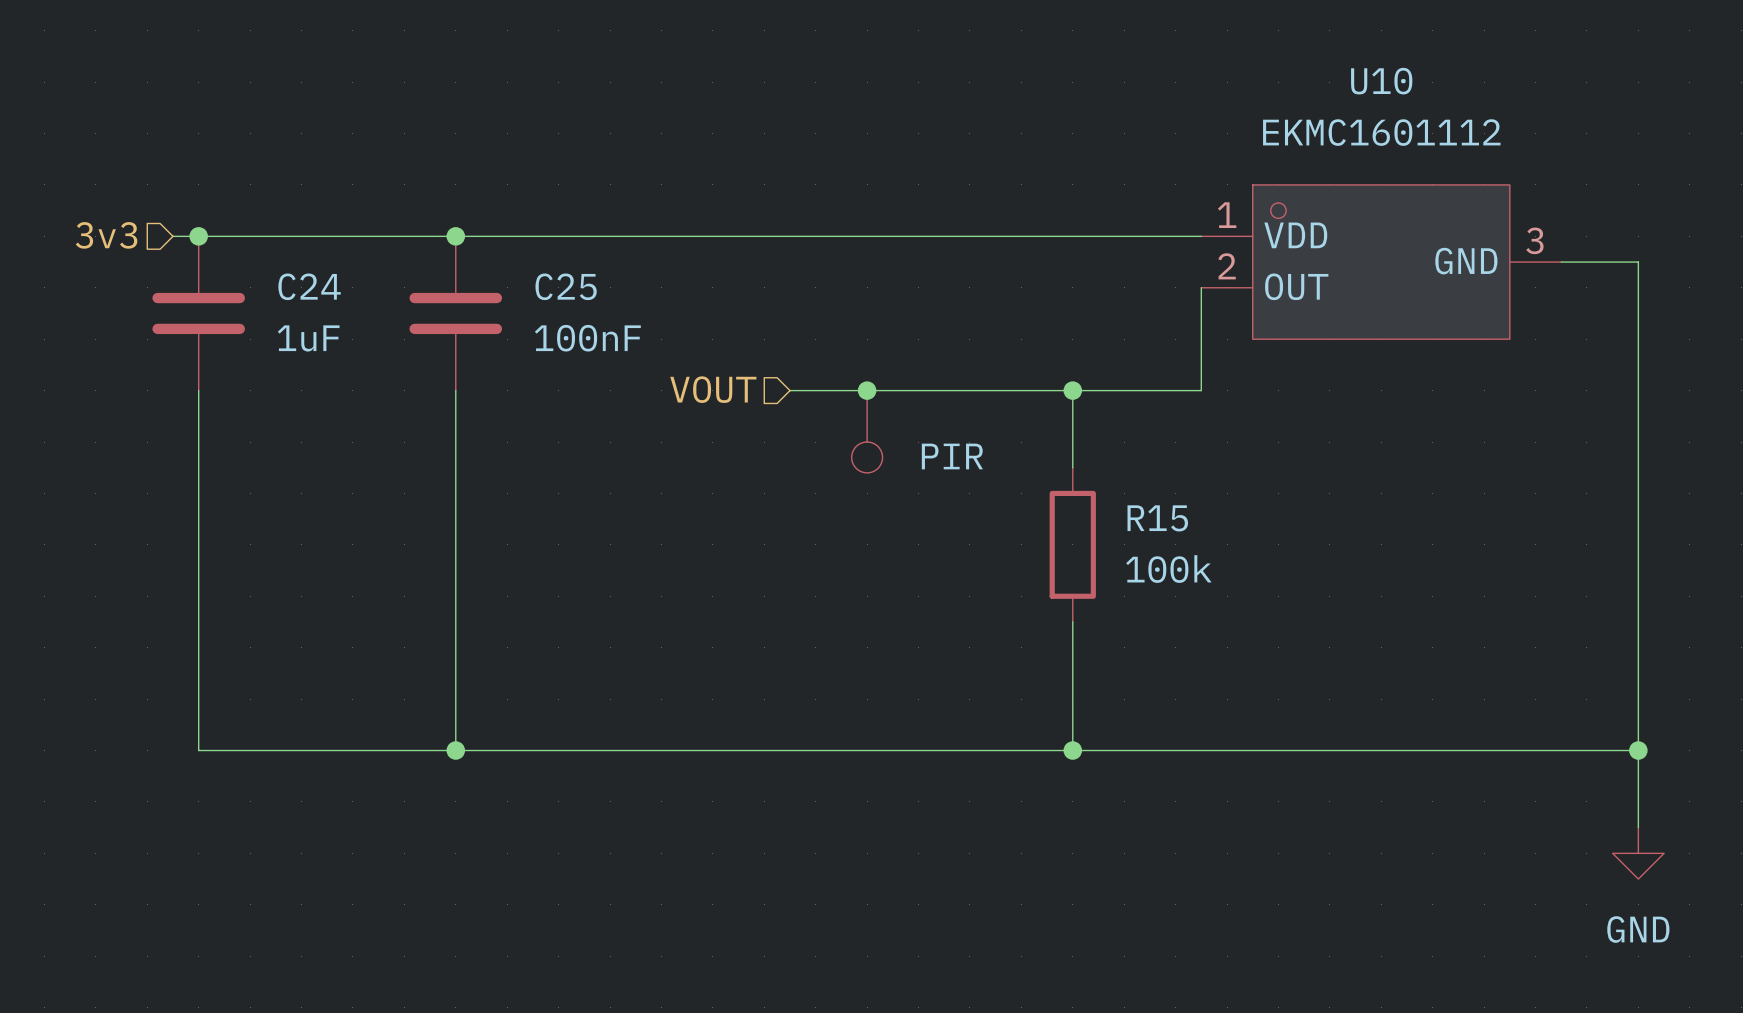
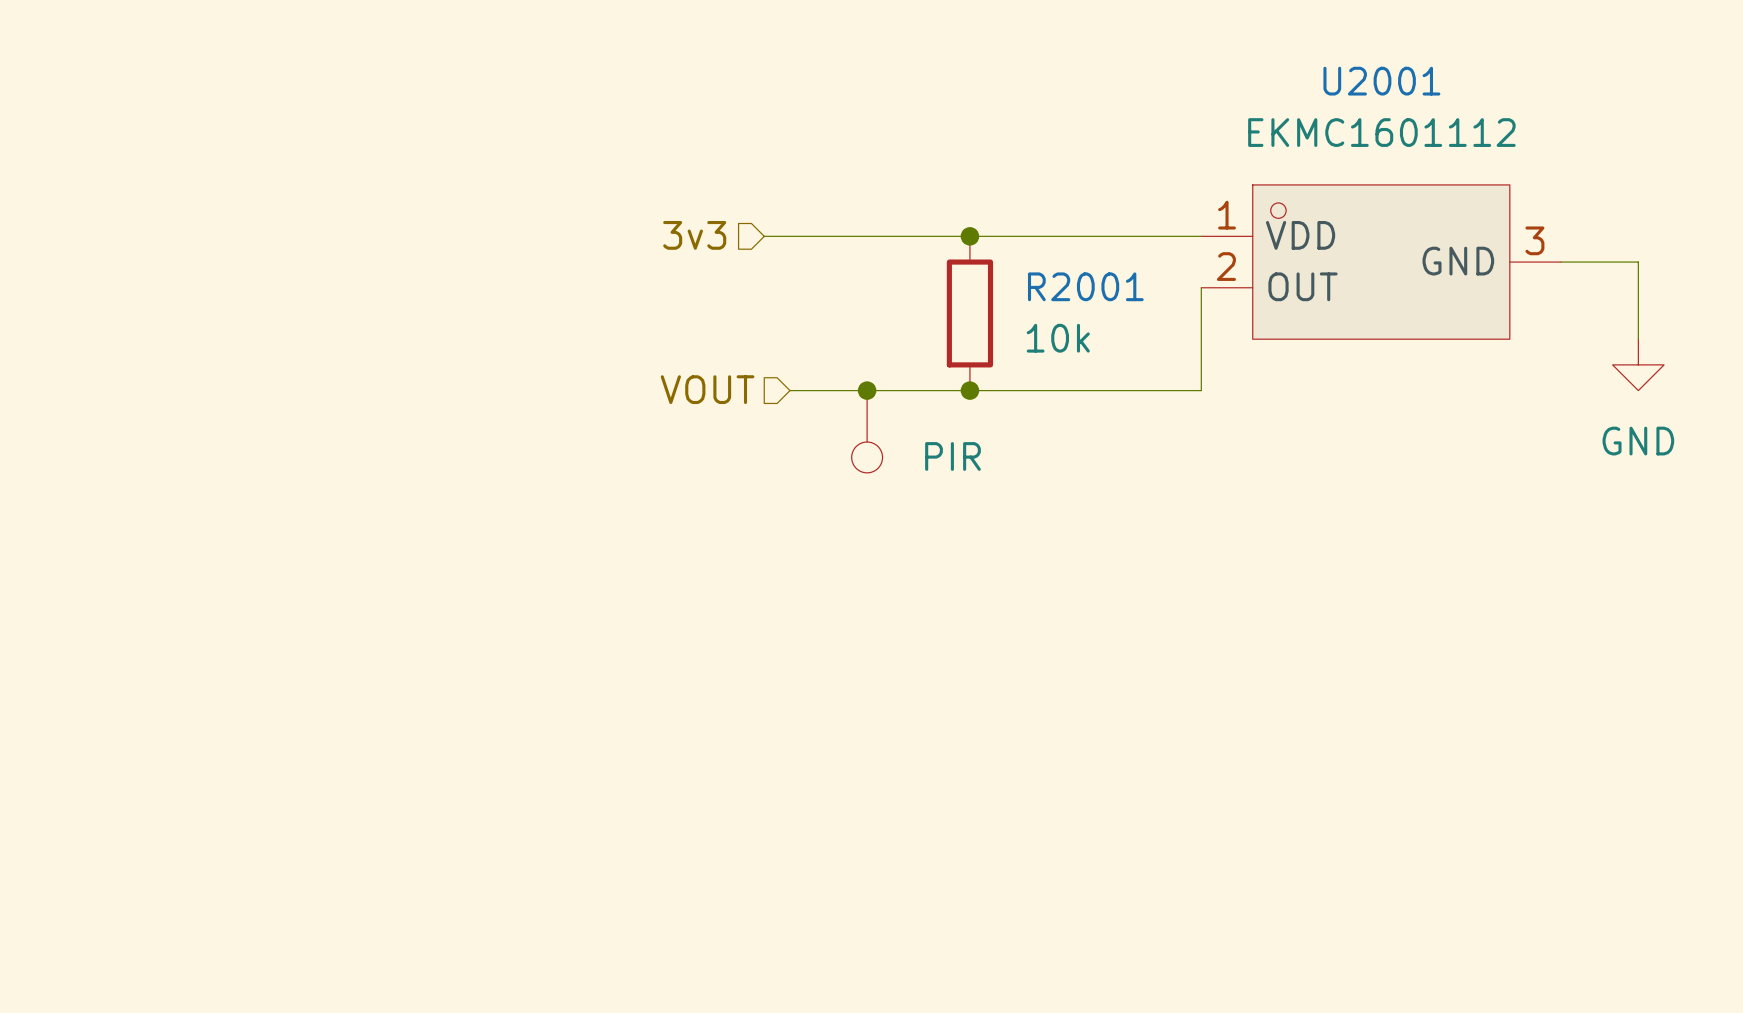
U10 name: U10 (1381, 81) -> U2001 (1381, 81)
hierarchical label: 3v3 (106, 235) -> none
hierarchical label: none -> 3v3 (694, 235)
wire: (172, 236) (764, 236) -> none
junction: (198, 236) -> none
junction: (455, 236) -> none
junction: none -> (969, 236)
C24: 1uF (198, 313) -> none
C25: 100nF (455, 313) -> none
R2001: none -> 10k (969, 313)
wire: (1638, 339) (1638, 827) -> none
wire: (198, 390) (198, 750) (1638, 750) -> none
wire: (455, 390) (455, 750) -> none
junction: none -> (969, 390)
wire: (1072, 390) (1072, 467) -> none
junction: (1072, 390) -> none
R15: 100k (1072, 544) -> none
wire: (1072, 621) (1072, 750) -> none
junction: (455, 750) -> none
junction: (1072, 750) -> none
junction: (1638, 750) -> none
power symbol position: GND (1638, 853) -> GND (1638, 364)

